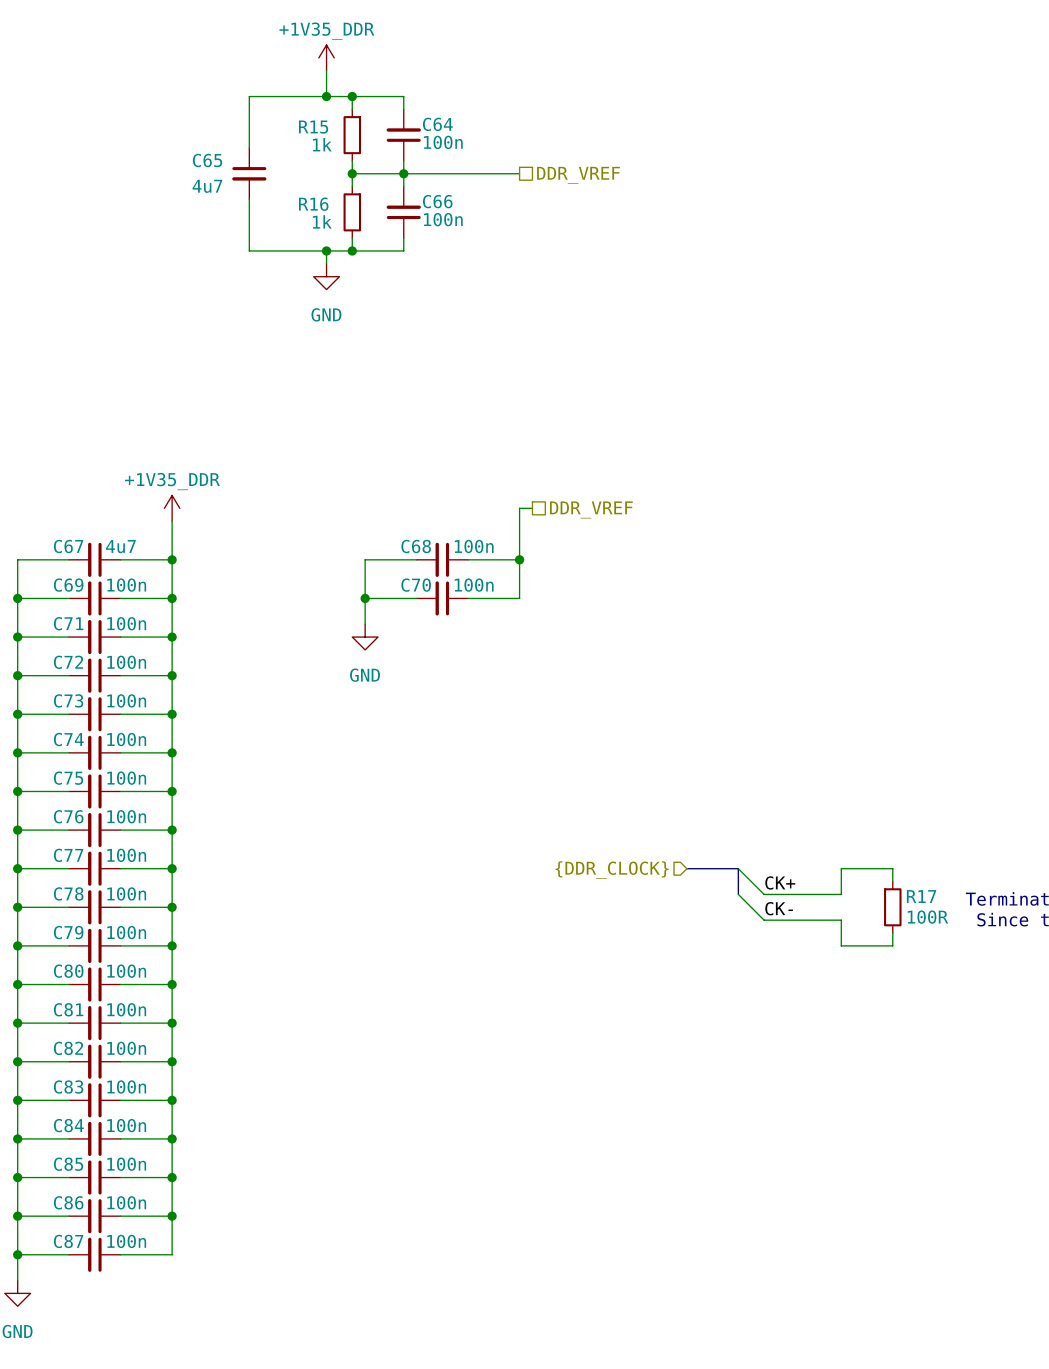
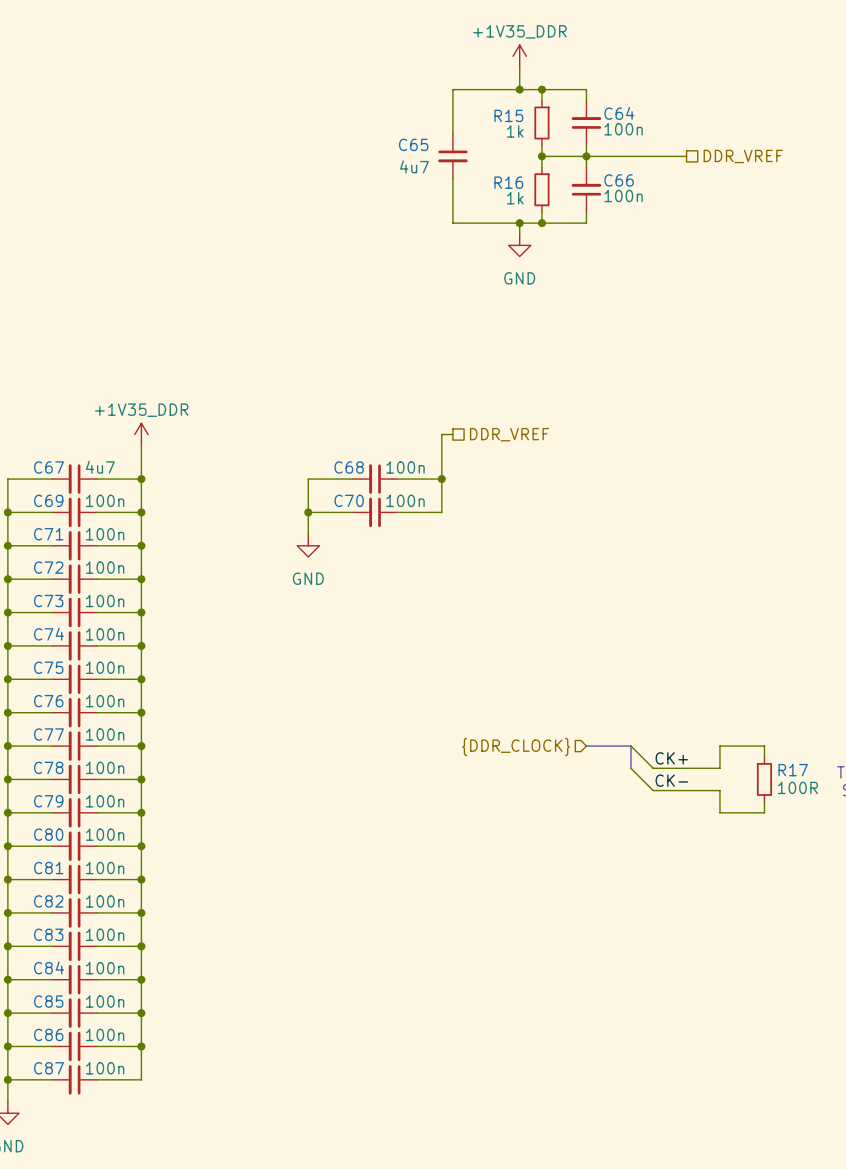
power symbol: +1V35_DDR (326, 57) -> none
wire: (326, 70) (326, 96) -> none
power symbol: none -> +1V35_DDR (519, 56)
junction: (326, 96) -> none
wire: (352, 96) (352, 109) -> none
junction: (352, 96) -> none
wire: (403, 109) (403, 96) (249, 96) (249, 148) -> none
junction: none -> (519, 89)
wire: none -> (541, 89) (541, 100)
junction: none -> (541, 89)
wire: none -> (586, 100) (586, 89) (452, 89) (452, 134)
R15 position: (352, 135) -> (541, 123)
C64 position: (403, 135) -> (586, 123)
wire: (352, 160) (352, 186) -> none
wire: (403, 160) (403, 186) -> (519, 67) (519, 89)
C65 position: (249, 173) -> (452, 156)
wire: (352, 173) (519, 173) -> none
junction: (352, 173) -> none
junction: (403, 173) -> none
wire: none -> (541, 145) (541, 167)
wire: none -> (586, 145) (586, 167)
hierarchical label: DDR_VREF (578, 175) -> none
wire: none -> (541, 156) (686, 156)
junction: none -> (541, 156)
junction: none -> (586, 156)
hierarchical label: none -> DDR_VREF (743, 156)
wire: (249, 199) (249, 250) (403, 250) (403, 238) -> none
R16 position: (352, 212) -> (541, 189)
C66 position: (403, 212) -> (586, 189)
wire: none -> (452, 178) (452, 223) (586, 223) (586, 212)
wire: (352, 238) (352, 250) -> none
wire: (326, 250) (326, 263) -> none
junction: (326, 250) -> none
junction: (352, 250) -> none
wire: none -> (541, 212) (541, 223)
wire: none -> (519, 223) (519, 234)
junction: none -> (519, 223)
junction: none -> (541, 223)
power symbol: GND (326, 276) -> none
power symbol: none -> GND (519, 245)

